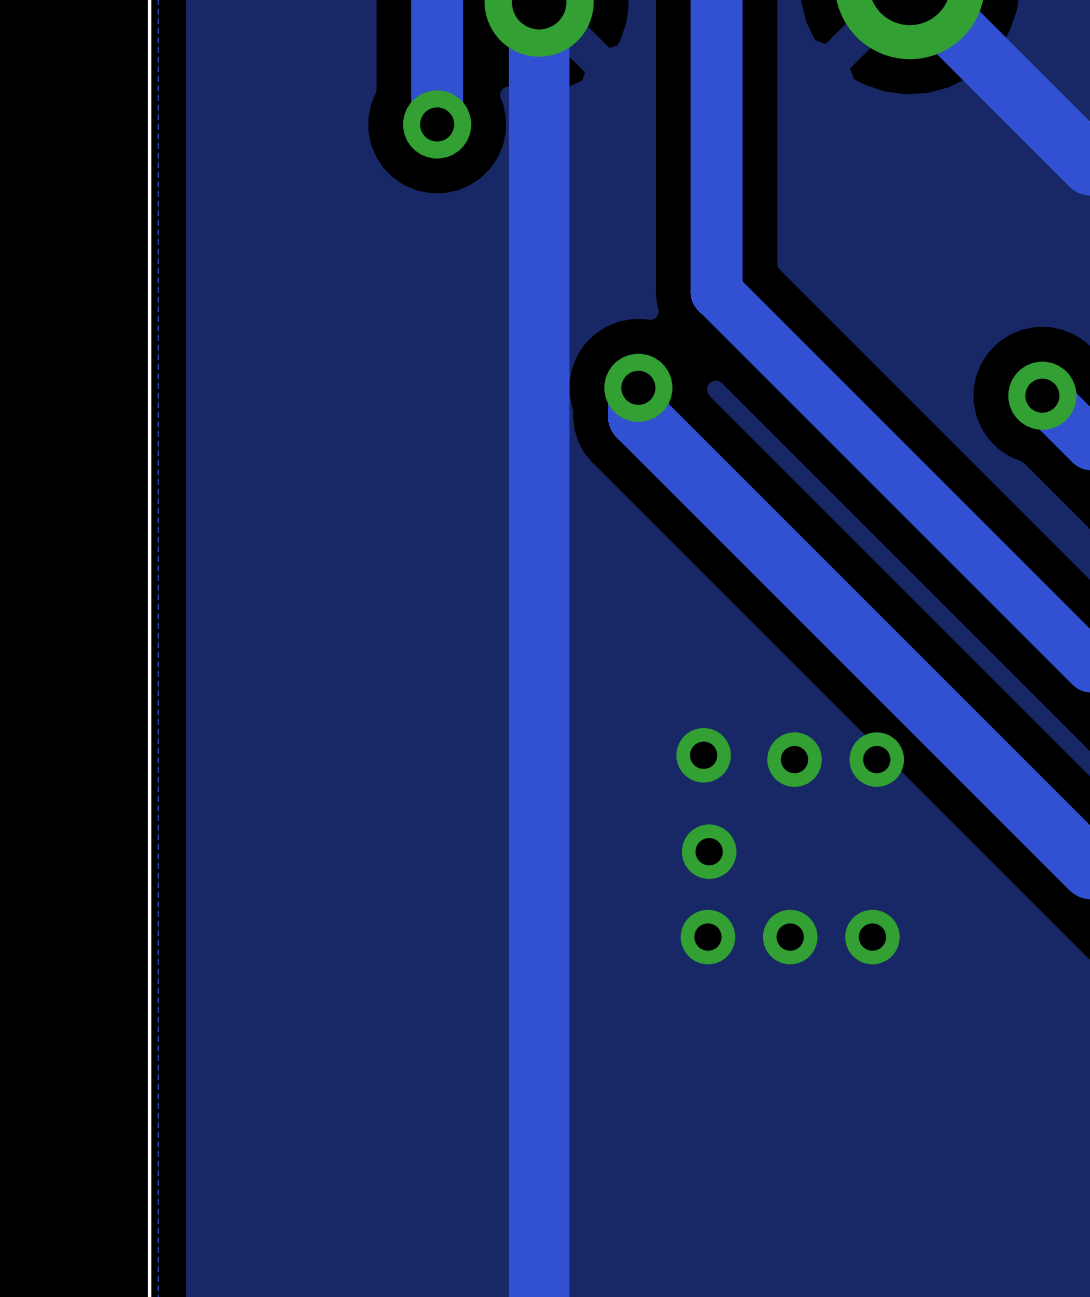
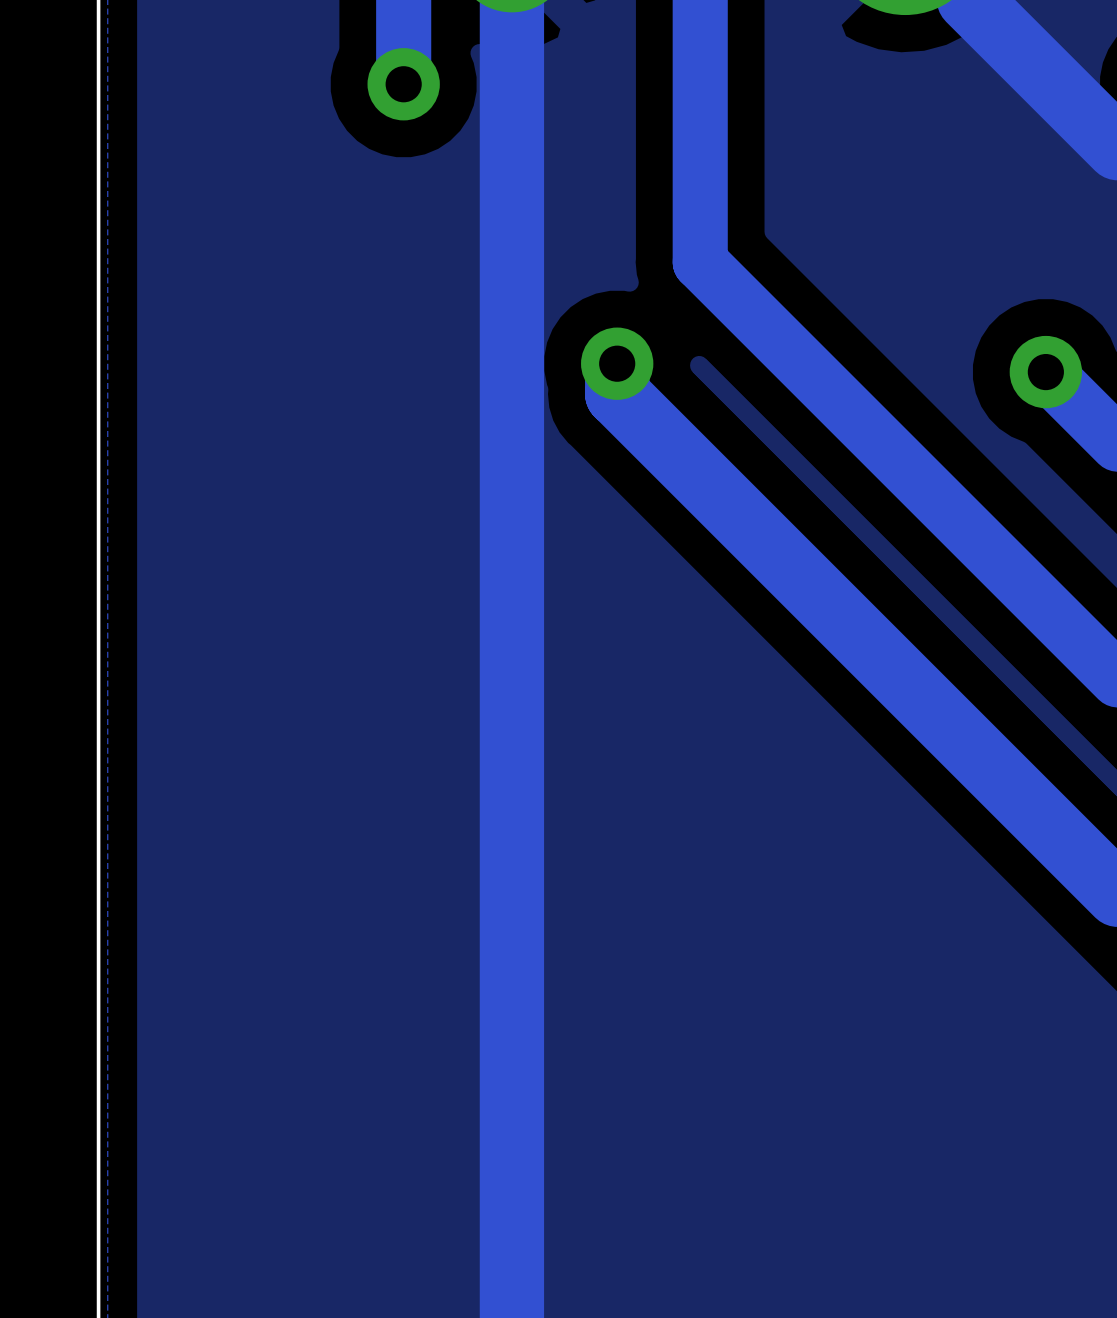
via: (703, 755) -> none
via: (794, 759) -> none
via: (876, 759) -> none
via: (709, 851) -> none
via: (707, 937) -> none
via: (790, 937) -> none
via: (872, 937) -> none

